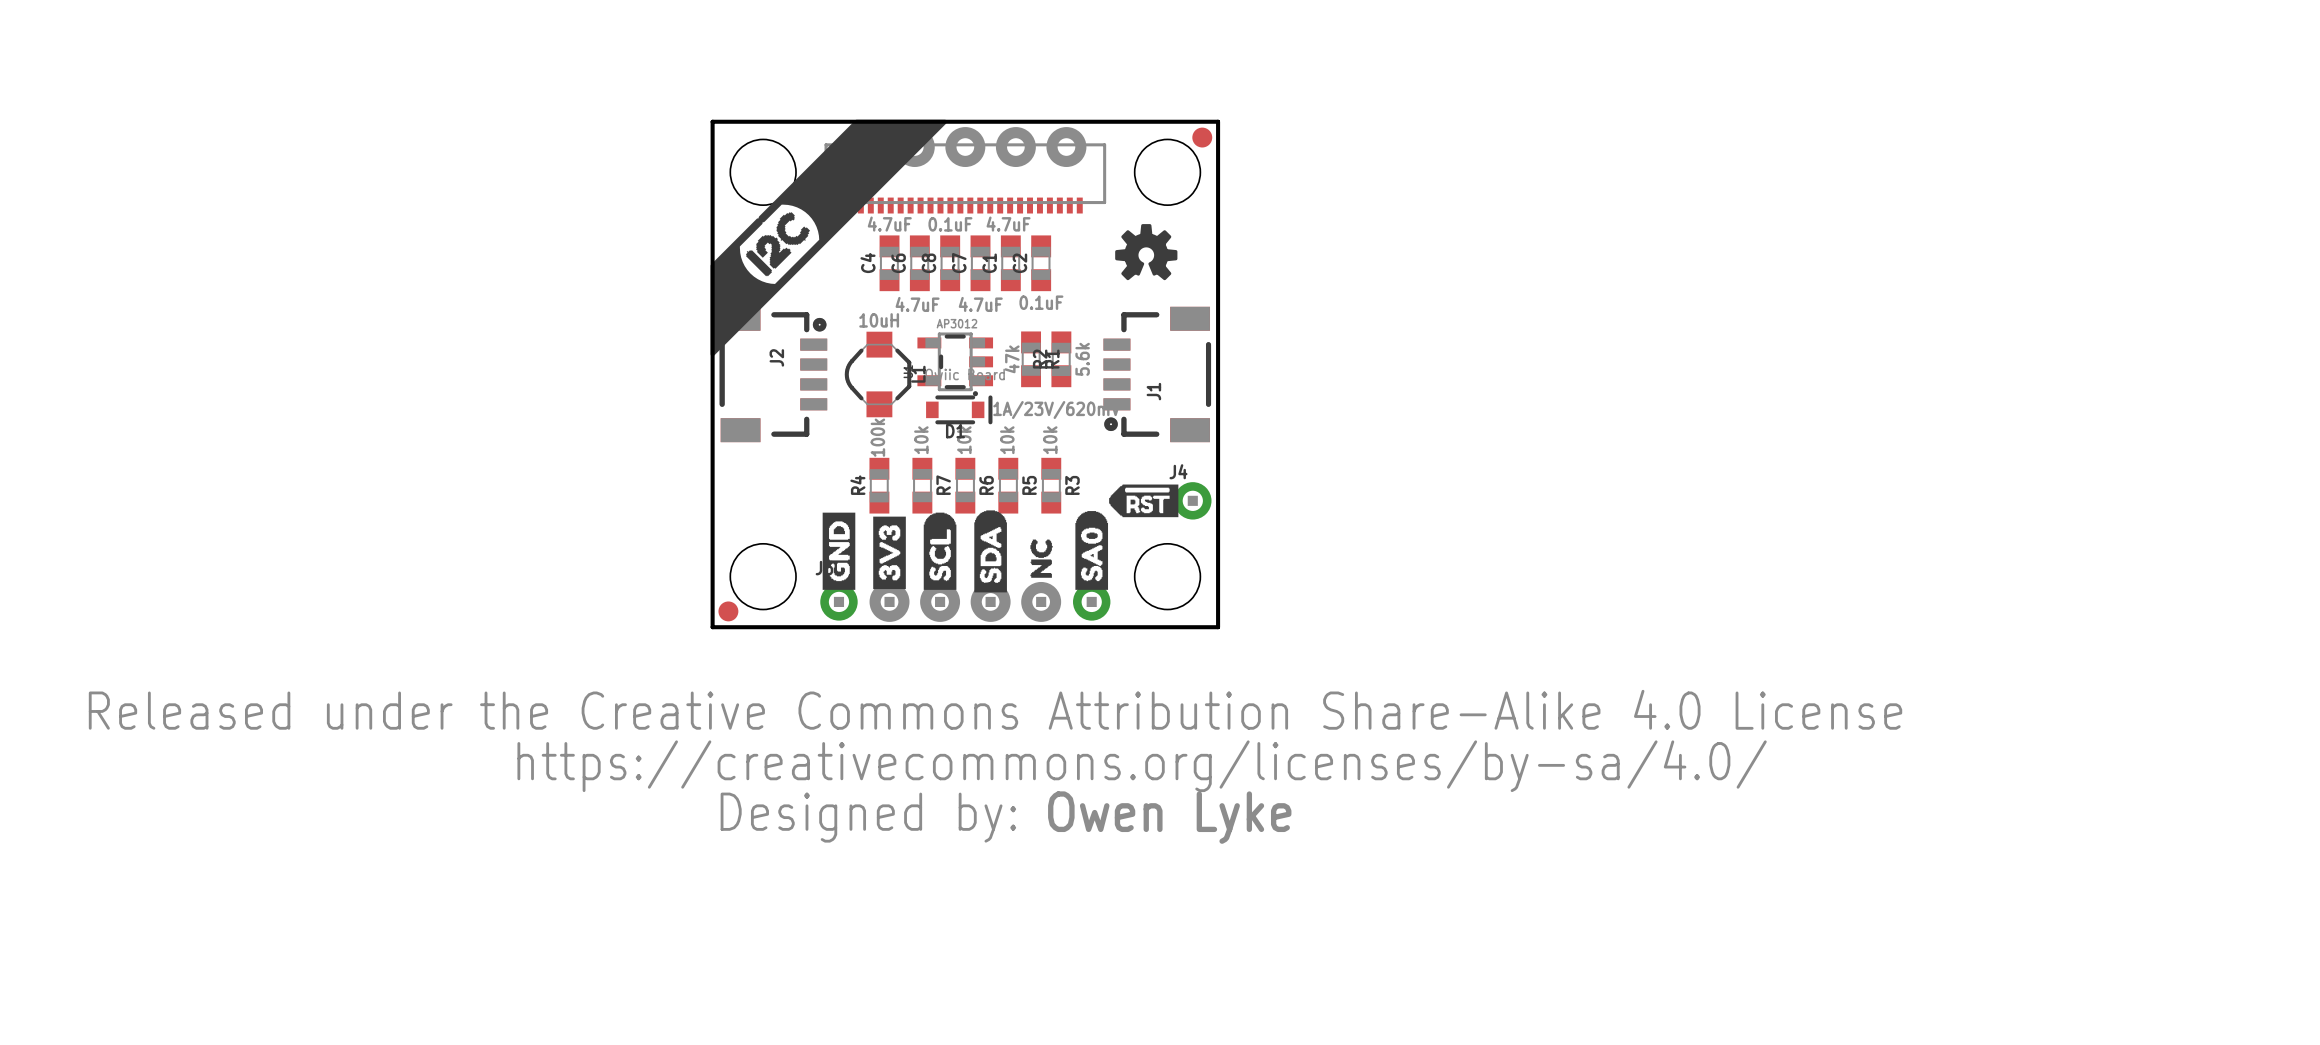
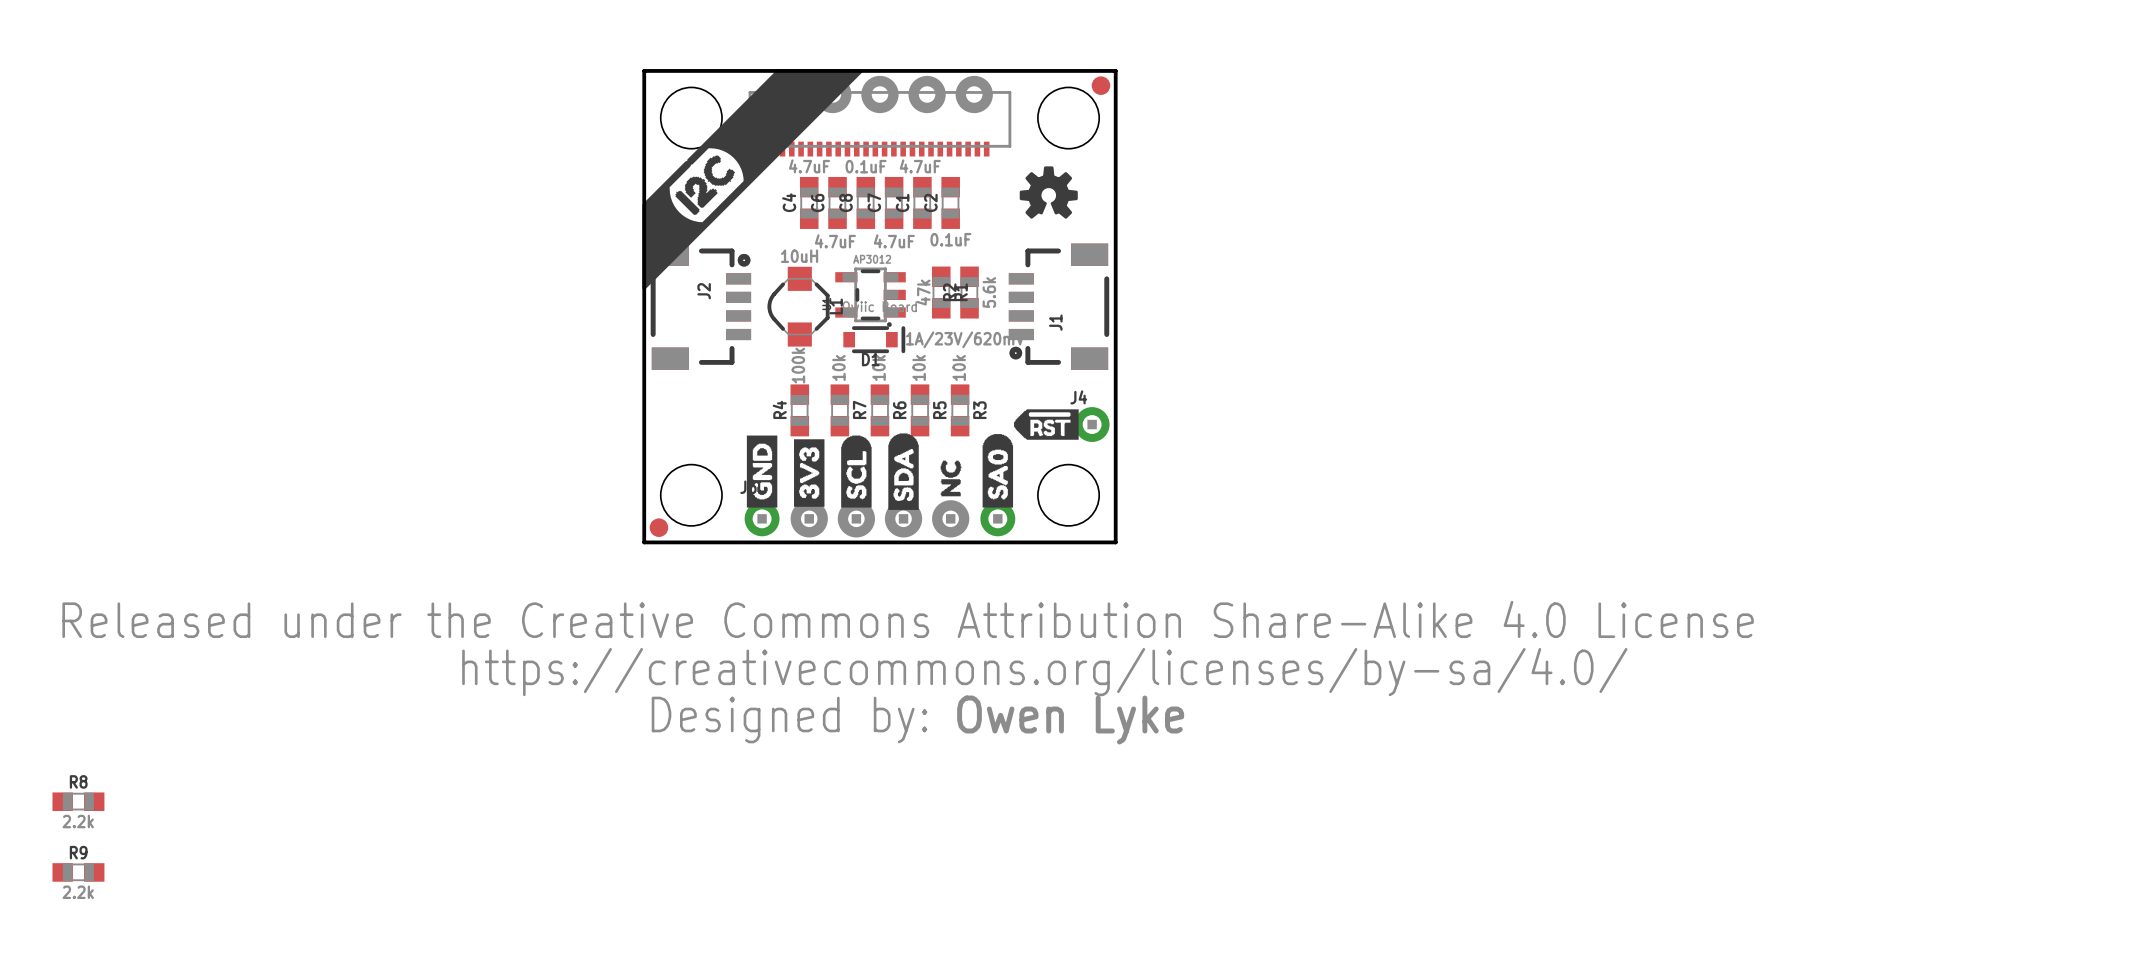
R8: none -> 2.2k (78, 801)
R9: none -> 2.2k (78, 872)

